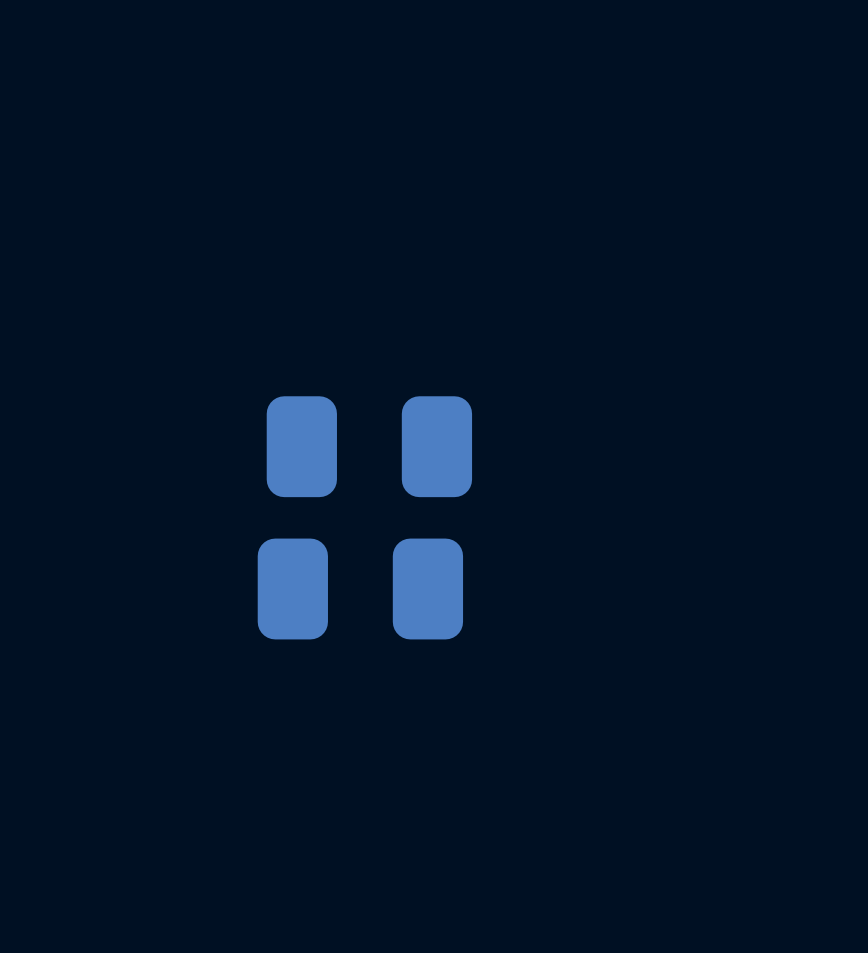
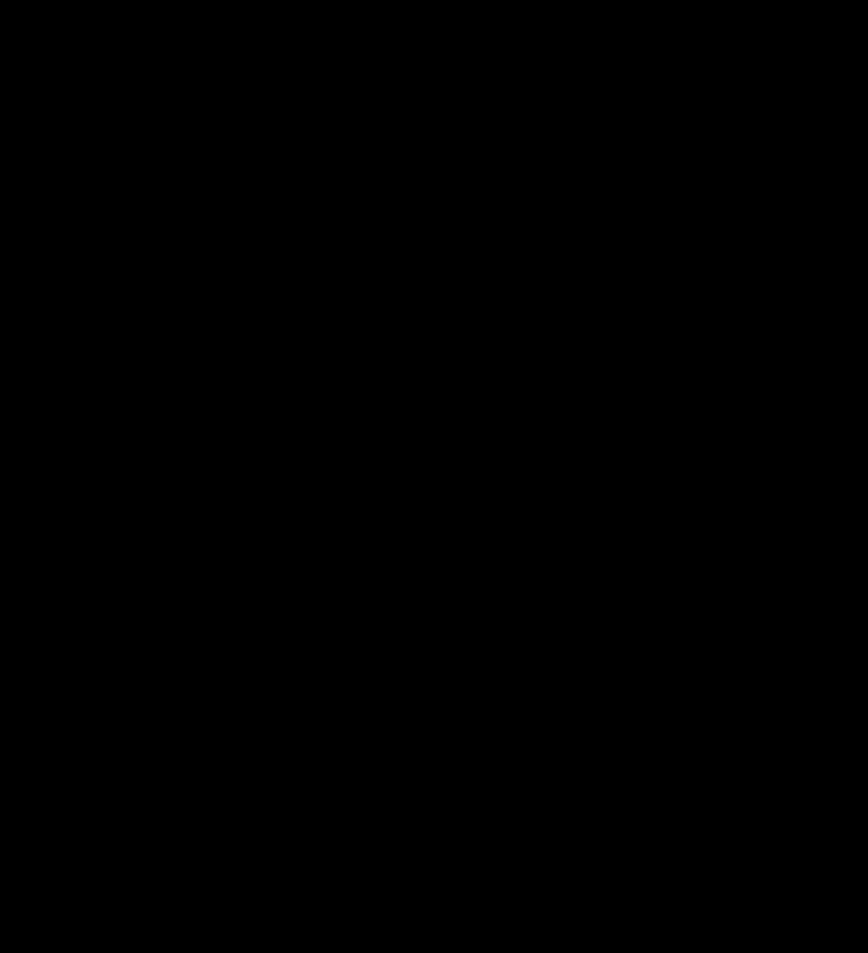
part: (369, 446) -> none
part: (360, 589) -> none

